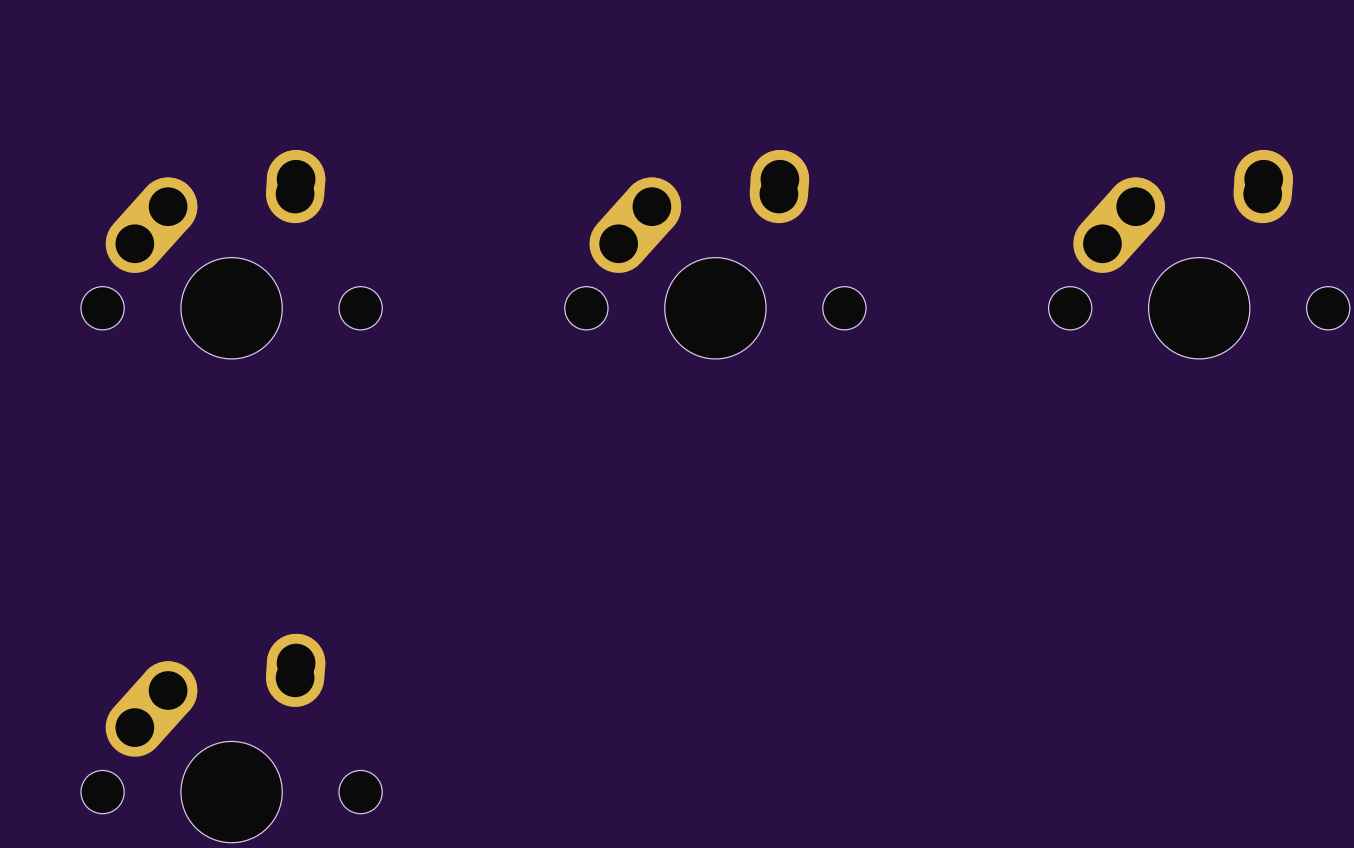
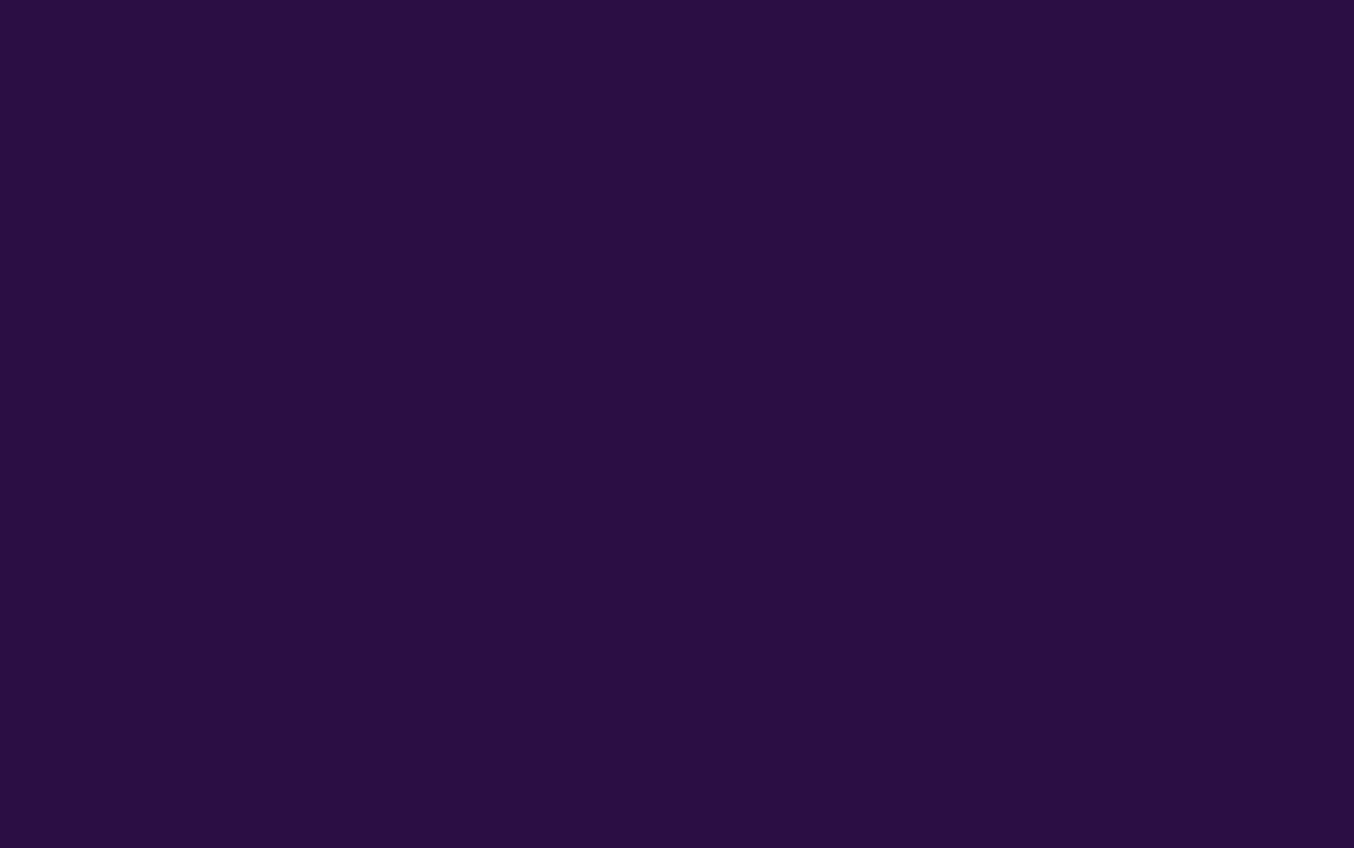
part: (231, 254) -> none
part: (715, 254) -> none
part: (1199, 254) -> none
part: (231, 738) -> none

